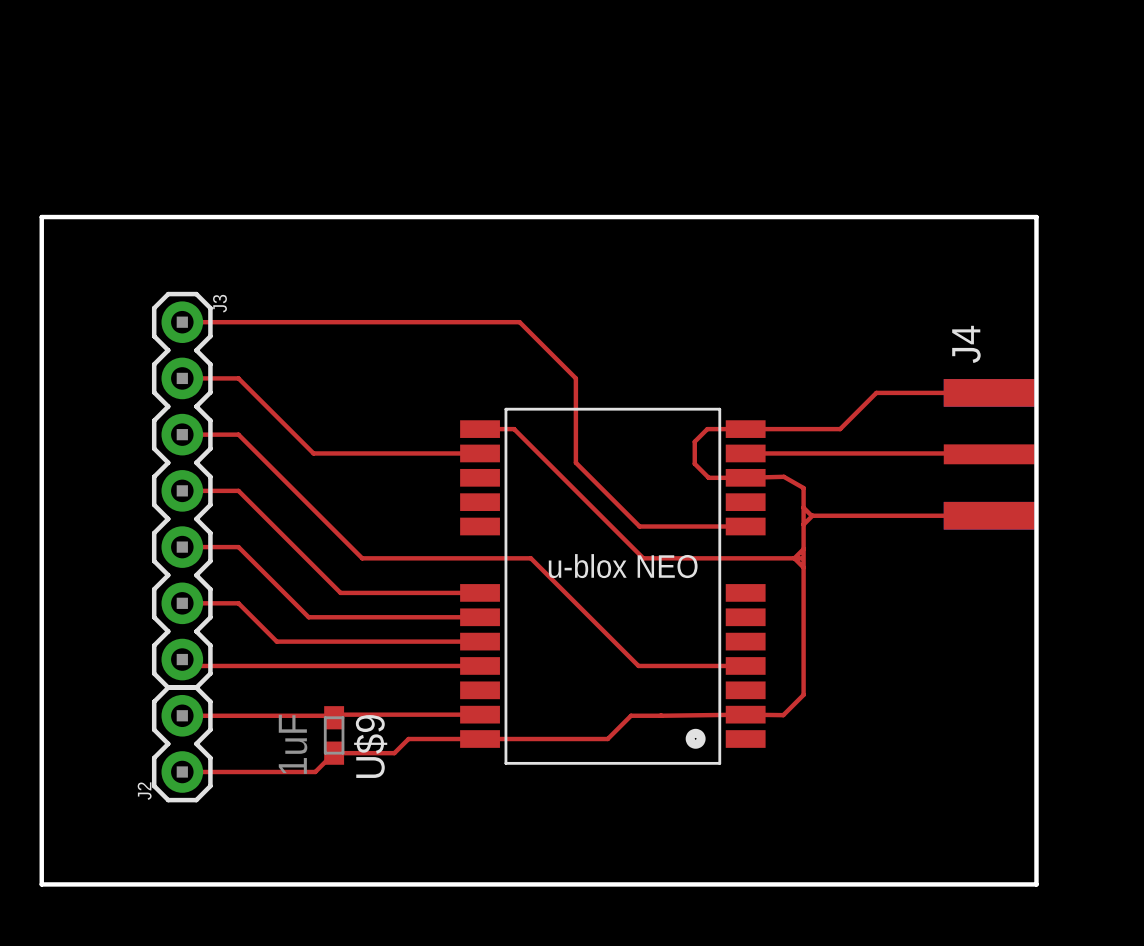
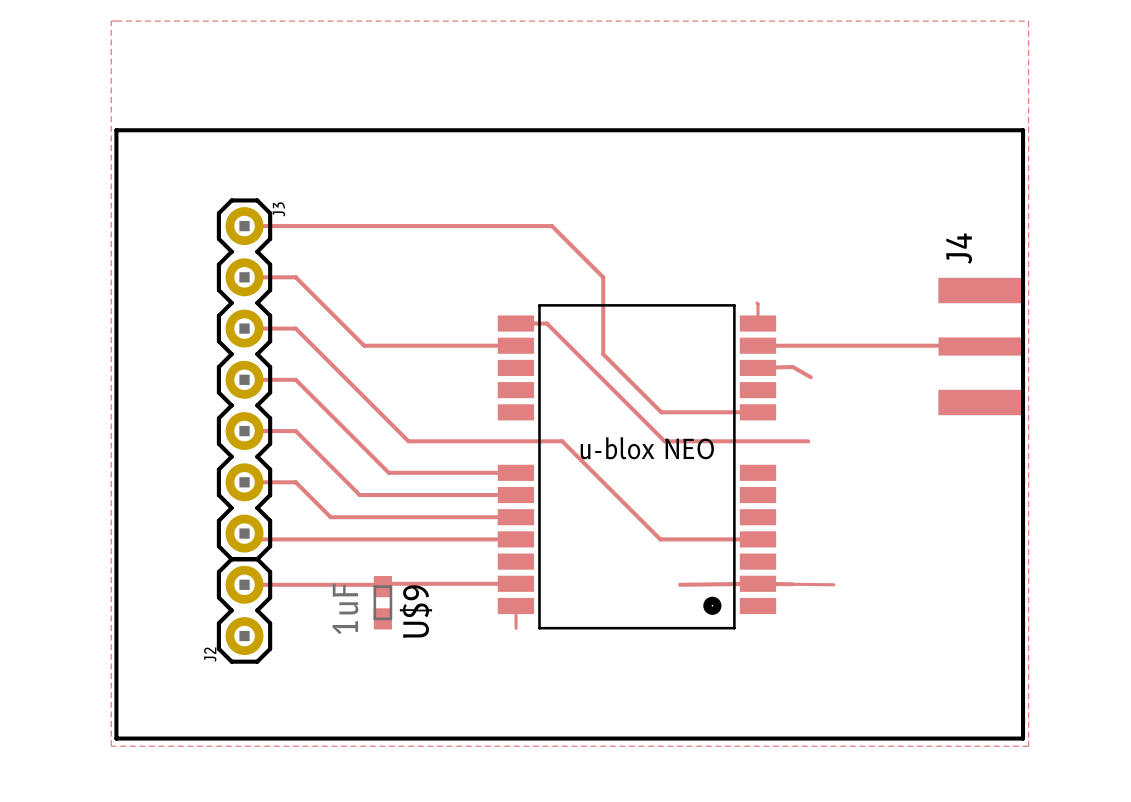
top zone outline: none -> (111, 21) (1028, 21) (1028, 746) (111, 746) (111, 21)
top track: (989, 392) (876, 392) (840, 429) (707, 429) (694, 441) (694, 463) (708, 477) (745, 477) -> none
top track: none -> (756, 302) (757, 323)
top track: (803, 488) (803, 694) (783, 715) -> (833, 584) (792, 584)
top track: (803, 507) (811, 515) (989, 515) -> none
top track: (812, 515) (803, 524) -> none
top track: (803, 549) (794, 558) (803, 567) -> none
top track: (661, 715) (631, 715) (607, 739) (408, 739) (394, 753) (334, 753) (315, 771) (182, 771) -> none
top track: none -> (515, 605) (516, 628)

